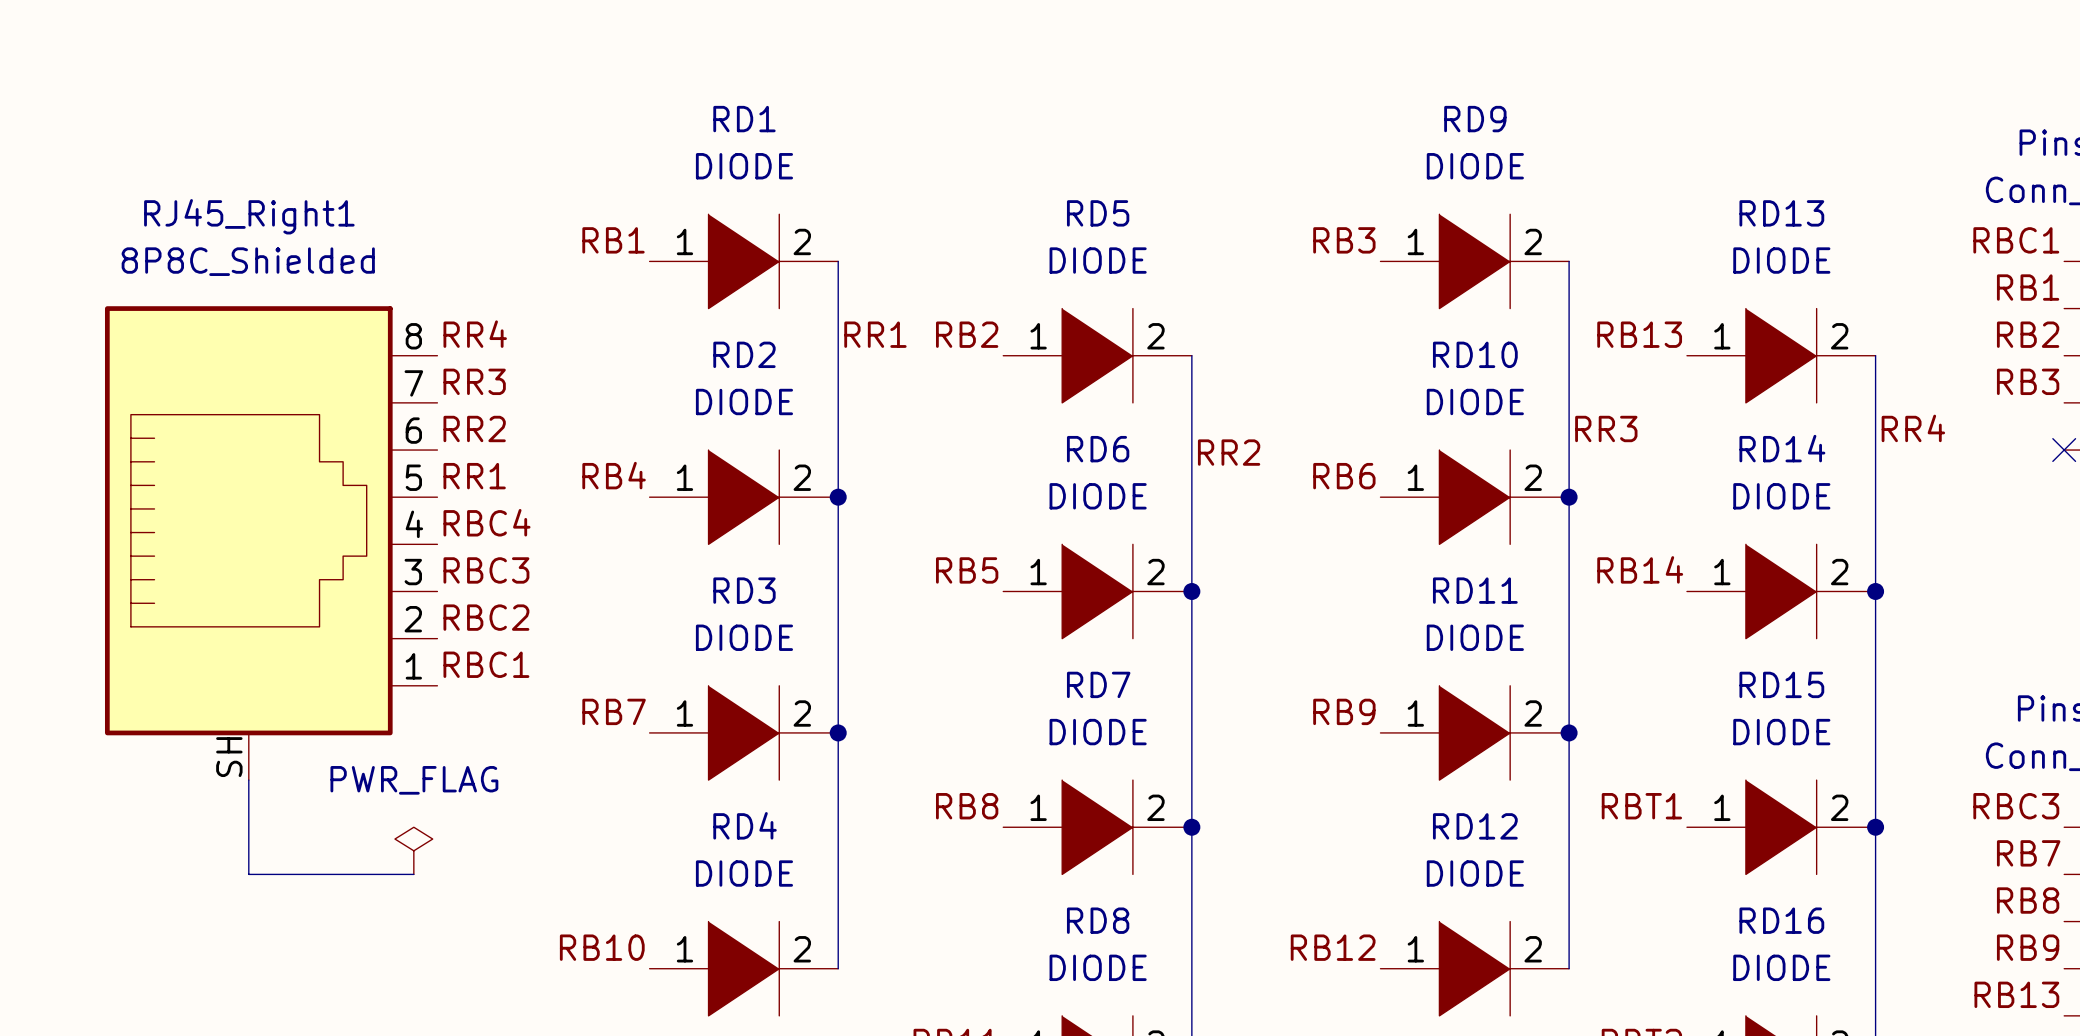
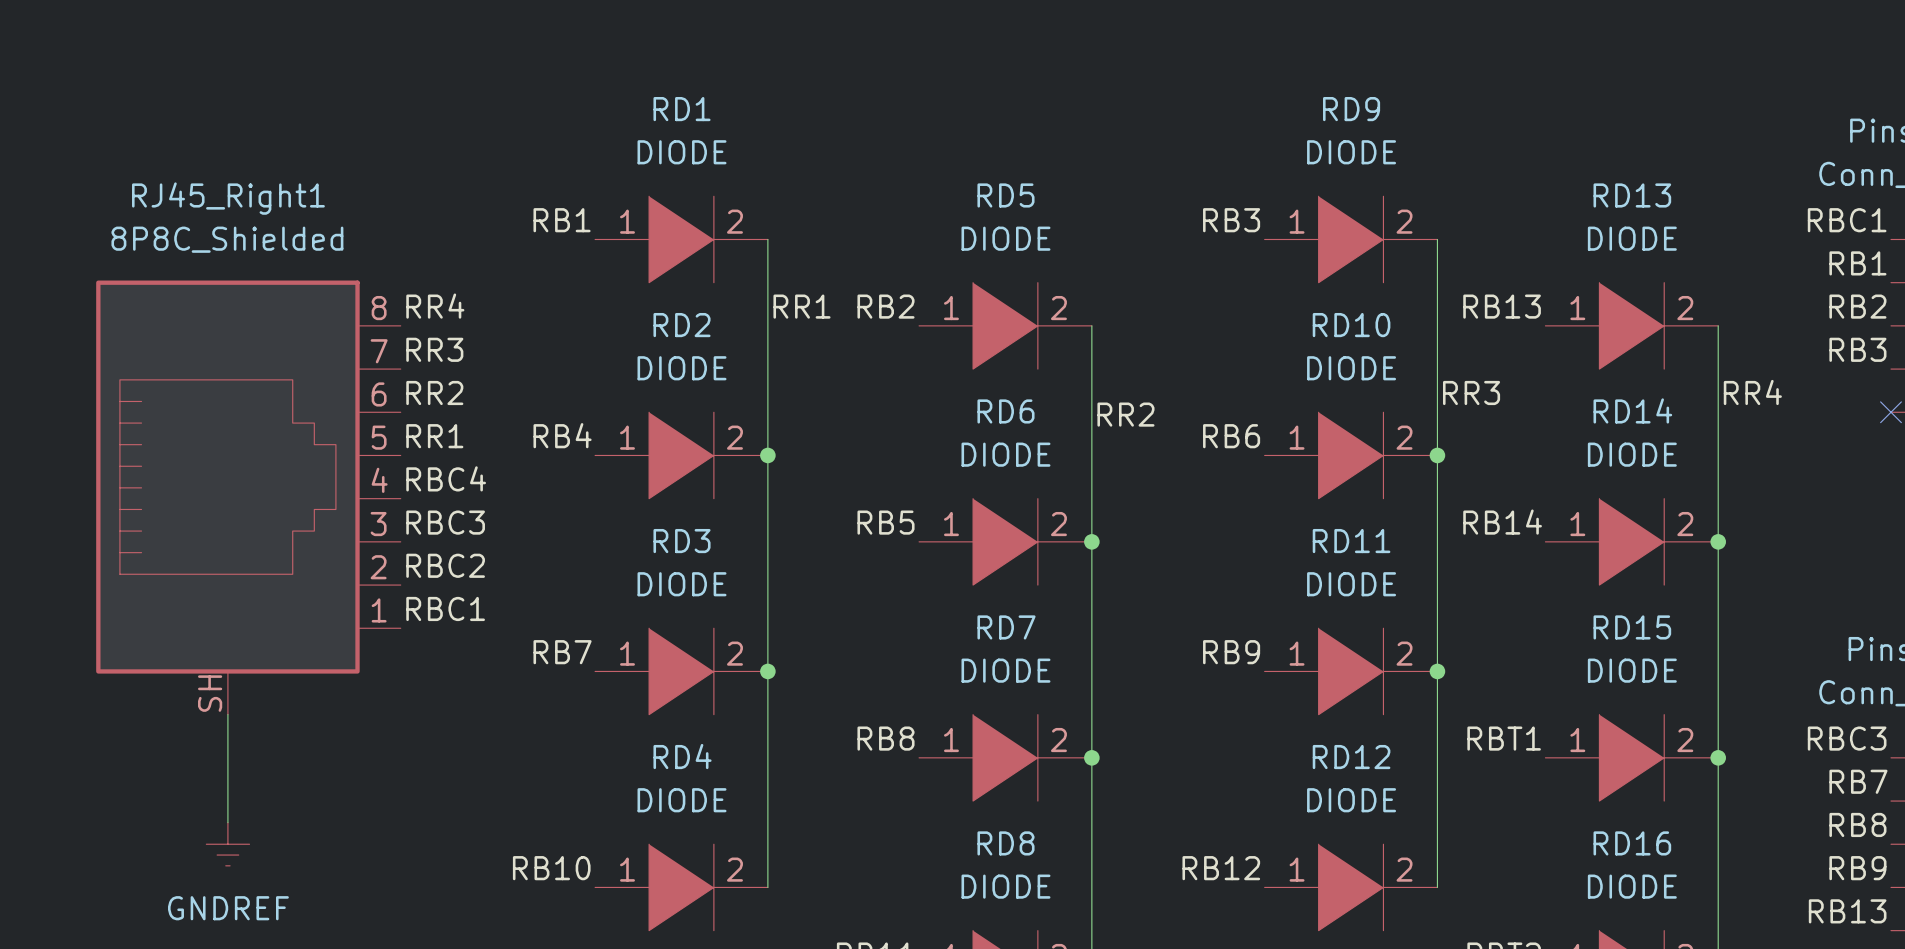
power symbol: PWR_FLAG (413, 850) -> none
wire: (248, 874) (413, 874) -> (227, 801) (227, 822)
power symbol: none -> GNDREF (227, 844)

